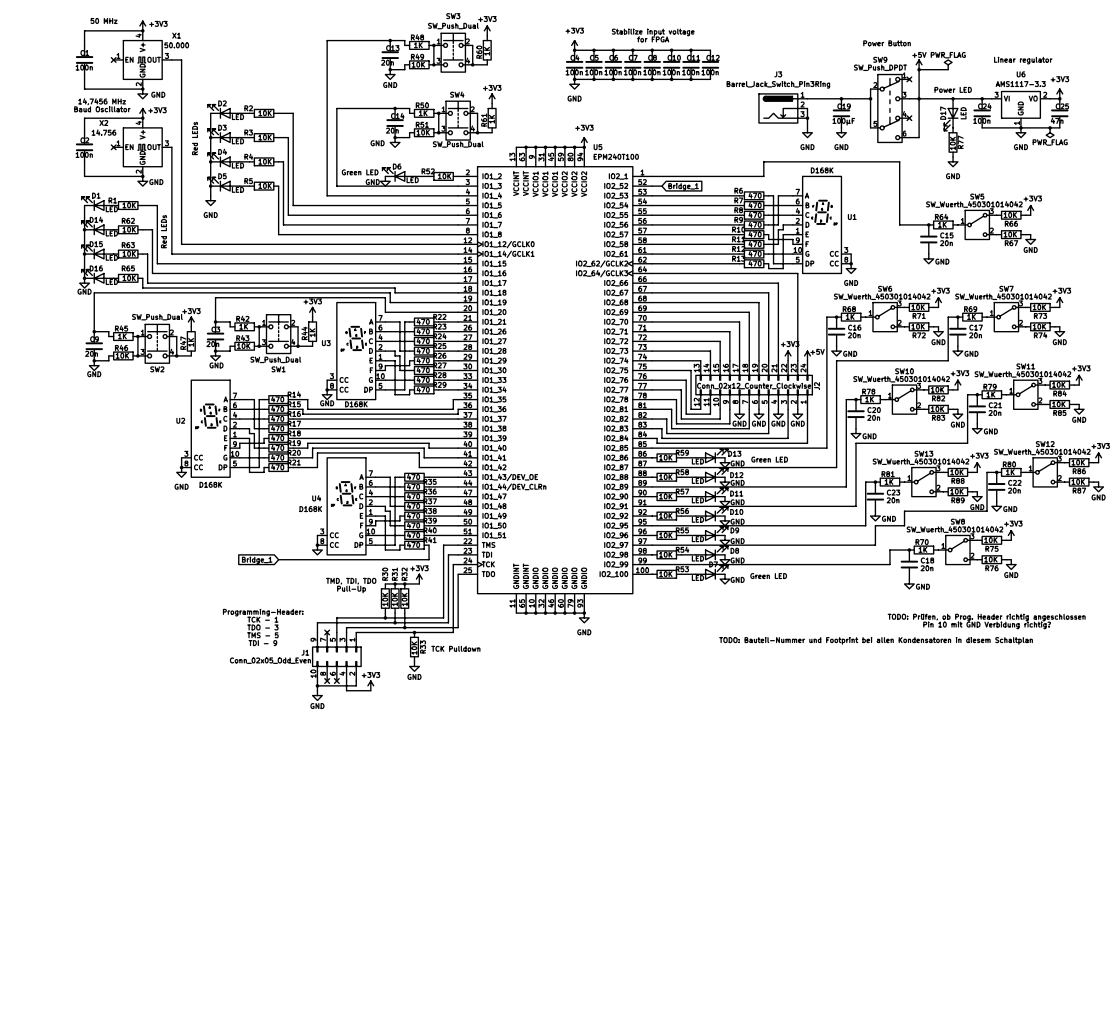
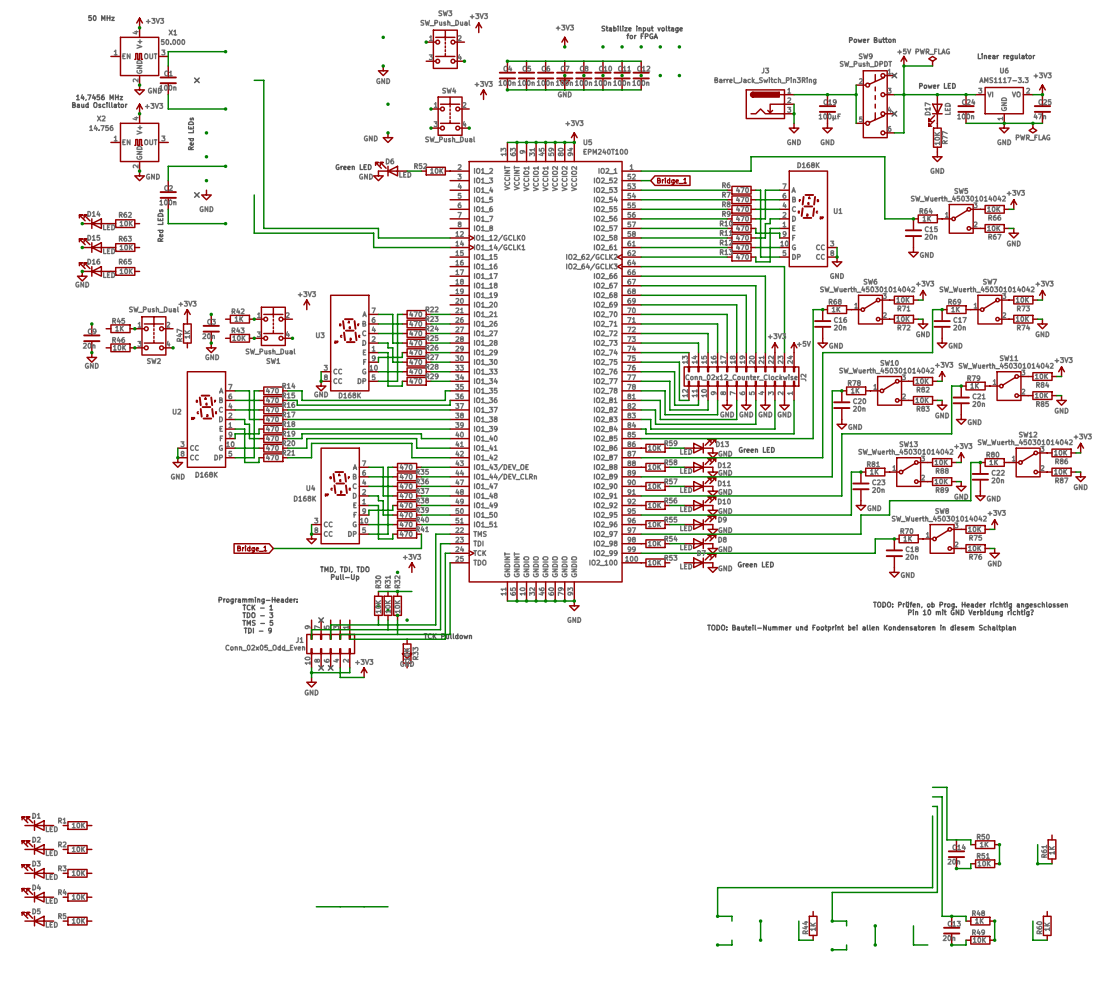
wire: (142, 30) (84, 30) (84, 45) -> (225, 51) (168, 51) (168, 66)
wire: (404, 45) (404, 40) (327, 40) (327, 195) (458, 195) -> none
part position: (419, 45) -> (980, 921)
wire: (433, 45) (433, 64) -> none
wire: (472, 45) (472, 64) (487, 64) -> none
part position: (487, 50) -> (1047, 925)
wire: (574, 50) (710, 50) -> (507, 61) (641, 61)
junction: (594, 50) -> none
junction: none -> (225, 51)
part position: (390, 55) -> (951, 930)
part position: (84, 59) -> (168, 80)
no-connect mark: (113, 59) -> none
wire: (171, 59) (181, 59) (181, 244) (385, 244) -> none
wire: (404, 64) (404, 69) (390, 69) -> none
part position: (419, 64) -> (980, 940)
junction: (433, 64) -> none
junction: none -> (507, 61)
part position: (574, 64) -> (507, 75)
part position: (594, 64) -> (526, 75)
part position: (613, 64) -> (545, 75)
part position: (632, 64) -> (564, 75)
part position: (652, 64) -> (583, 75)
part position: (671, 64) -> (602, 75)
part position: (691, 64) -> (622, 75)
part position: (710, 64) -> (641, 75)
wire: (84, 74) (84, 89) (142, 89) -> (168, 94) (168, 108) (225, 108)
wire: (574, 79) (710, 79) -> (507, 89) (641, 89)
no-connect mark: none -> (196, 80)
junction: none -> (507, 89)
part position: (223, 111) -> (37, 847)
wire: (210, 113) (210, 195) -> none
junction: none -> (225, 108)
wire: (239, 113) (249, 113) -> none
part position: (264, 113) -> (77, 849)
wire: (278, 113) (293, 113) (293, 205) (458, 205) -> none
wire: (409, 113) (409, 108) (336, 108) (336, 186) (458, 186) -> none
part position: (424, 113) -> (985, 844)
wire: (438, 113) (438, 132) -> none
wire: (477, 113) (477, 132) (492, 132) -> none
wire: (142, 118) (84, 118) (84, 132) -> none
part position: (492, 118) -> (1052, 849)
part position: (395, 123) -> (956, 854)
wire: (409, 132) (409, 137) (395, 137) -> none
part position: (424, 132) -> (985, 863)
part position: (223, 135) -> (37, 871)
wire: (239, 137) (249, 137) -> none
part position: (264, 137) -> (77, 873)
wire: (278, 137) (288, 137) (288, 215) (458, 215) -> none
part position: (84, 147) -> (168, 194)
no-connect mark: (113, 147) -> none
wire: (171, 147) (171, 171) -> (225, 166) (168, 166)
part position: (223, 160) -> (37, 895)
wire: (84, 161) (84, 176) (142, 176) -> none
wire: (239, 161) (249, 161) -> none
part position: (264, 161) -> (77, 897)
wire: (278, 161) (283, 161) (283, 224) (458, 224) -> none
junction: none -> (225, 166)
part position: (223, 184) -> (37, 919)
wire: (239, 186) (249, 186) -> none
part position: (264, 186) -> (77, 921)
wire: (278, 186) (278, 234) -> (254, 80) (263, 80) (263, 228) (273, 228)
no-connect mark: none -> (196, 194)
part position: (97, 203) -> (37, 823)
wire: (84, 205) (84, 278) -> none
part position: (128, 205) -> (77, 825)
wire: (142, 205) (157, 205) (157, 263) (458, 263) -> none
wire: (142, 229) (152, 229) (152, 273) (458, 273) -> none
wire: (171, 229) (171, 254) (380, 254) -> (254, 194) (254, 233) (373, 233) (373, 247)
wire: none -> (168, 223) (225, 223)
junction: none -> (225, 223)
wire: (385, 234) (458, 234) -> (378, 228) (378, 237)
wire: (142, 254) (147, 254) (147, 283) (458, 283) -> none
wire: (142, 278) (142, 288) (395, 288) (395, 292) (458, 292) -> none
wire: (458, 302) (390, 302) (390, 292) (94, 292) (94, 331) (108, 331) (108, 336) -> none
wire: (458, 312) (385, 312) (385, 297) (215, 297) (215, 321) (230, 321) (230, 326) -> none
wire: (259, 326) (259, 346) -> none
wire: (298, 326) (298, 346) (312, 346) -> none
part position: (312, 331) -> (813, 925)
wire: (137, 336) (137, 355) -> none
wire: (176, 336) (176, 355) (191, 355) -> none
wire: (230, 346) (230, 351) (215, 351) -> none
wire: (108, 355) (108, 360) (94, 360) -> none
wire: (681, 574) (695, 574) -> none
wire: (385, 583) (419, 583) -> (378, 591) (411, 591)
junction position: (395, 583) -> (397, 591)
part position: (385, 598) -> (378, 605)
part position: (395, 598) -> (387, 605)
part position: (404, 598) -> (397, 605)
wire: (404, 613) (404, 627) -> (397, 620) (397, 634)
wire: (443, 617) (336, 617) (336, 632) -> (435, 605) (435, 624) (330, 624) (330, 639)
wire: (448, 622) (317, 622) (317, 632) -> (440, 610) (440, 629) (311, 629) (311, 639)
wire: (458, 627) (346, 627) (346, 632) -> (450, 615) (450, 634) (340, 634) (340, 639)
wire: (356, 632) (453, 632) -> (349, 639) (445, 639) (445, 620)
part position: (414, 647) -> (407, 653)
wire: none -> (932, 787) (946, 787) (946, 839) (970, 839) (970, 844)
wire: none -> (932, 796) (942, 796) (942, 916) (966, 916) (966, 921)
wire: none -> (932, 806) (937, 806) (937, 892) (832, 892) (832, 921) (846, 921) (846, 925)
wire: none -> (932, 816) (932, 887) (717, 887) (717, 916) (731, 916) (731, 921)
wire: none -> (999, 844) (999, 863)
junction: none -> (999, 844)
wire: none -> (1037, 844) (1037, 863) (1052, 863)
wire: none -> (970, 863) (970, 868) (956, 868)
junction: none -> (999, 863)
junction: none -> (1037, 863)
junction: none -> (956, 868)
wire: none -> (316, 906) (387, 906)
junction: none -> (717, 916)
junction: none -> (951, 916)
wire: none -> (760, 921) (760, 940)
junction: none -> (760, 921)
wire: none -> (798, 921) (798, 940) (813, 940)
junction: none -> (832, 921)
wire: none -> (994, 921) (994, 940)
junction: none -> (994, 921)
wire: none -> (1032, 921) (1032, 940) (1047, 940)
wire: none -> (875, 925) (875, 944)
junction: none -> (875, 925)
wire: none -> (913, 925) (913, 944) (927, 944)
wire: none -> (731, 940) (731, 944) (717, 944)
junction: none -> (760, 940)
wire: none -> (966, 940) (966, 944) (951, 944)
junction: none -> (994, 940)
junction: none -> (717, 944)
wire: none -> (846, 944) (846, 949) (832, 949)
junction: none -> (875, 944)
junction: none -> (951, 944)
junction: none -> (832, 949)

